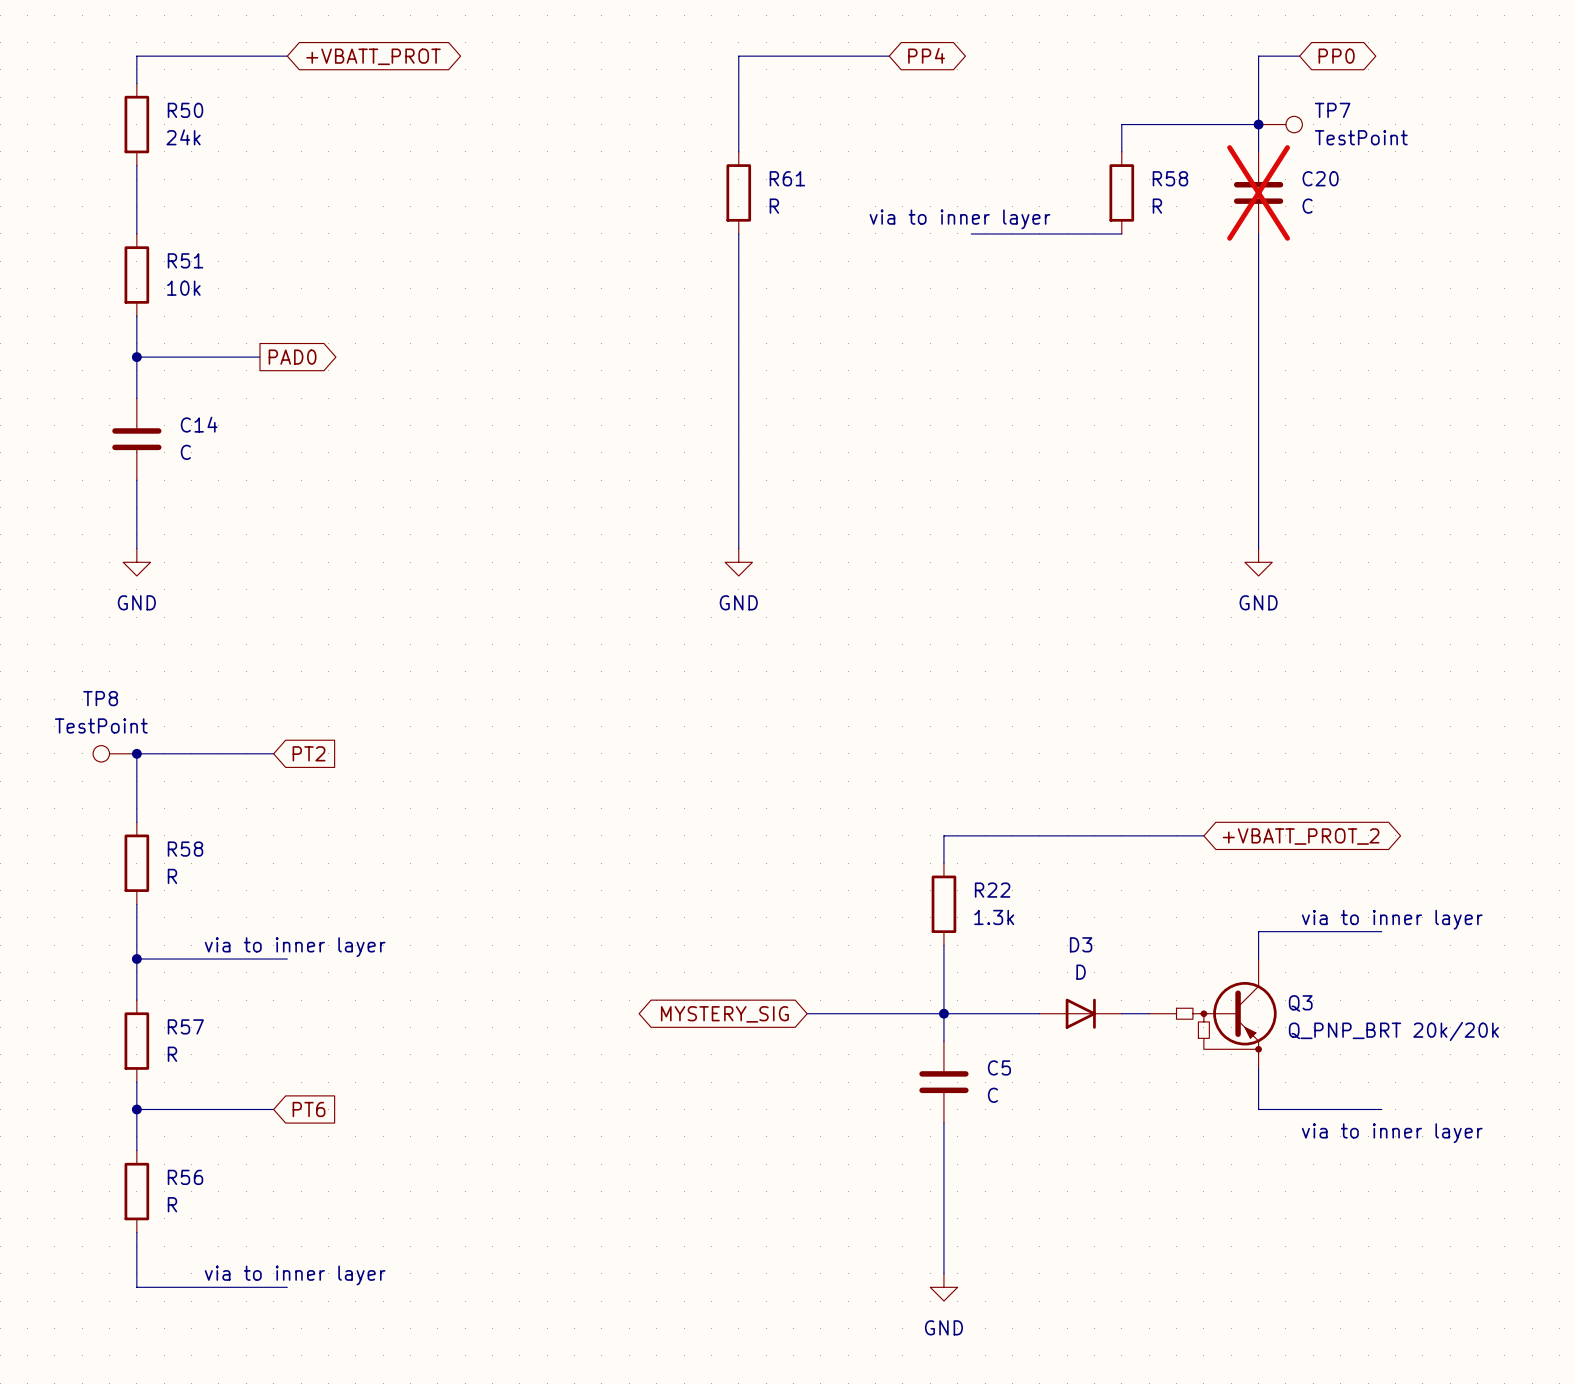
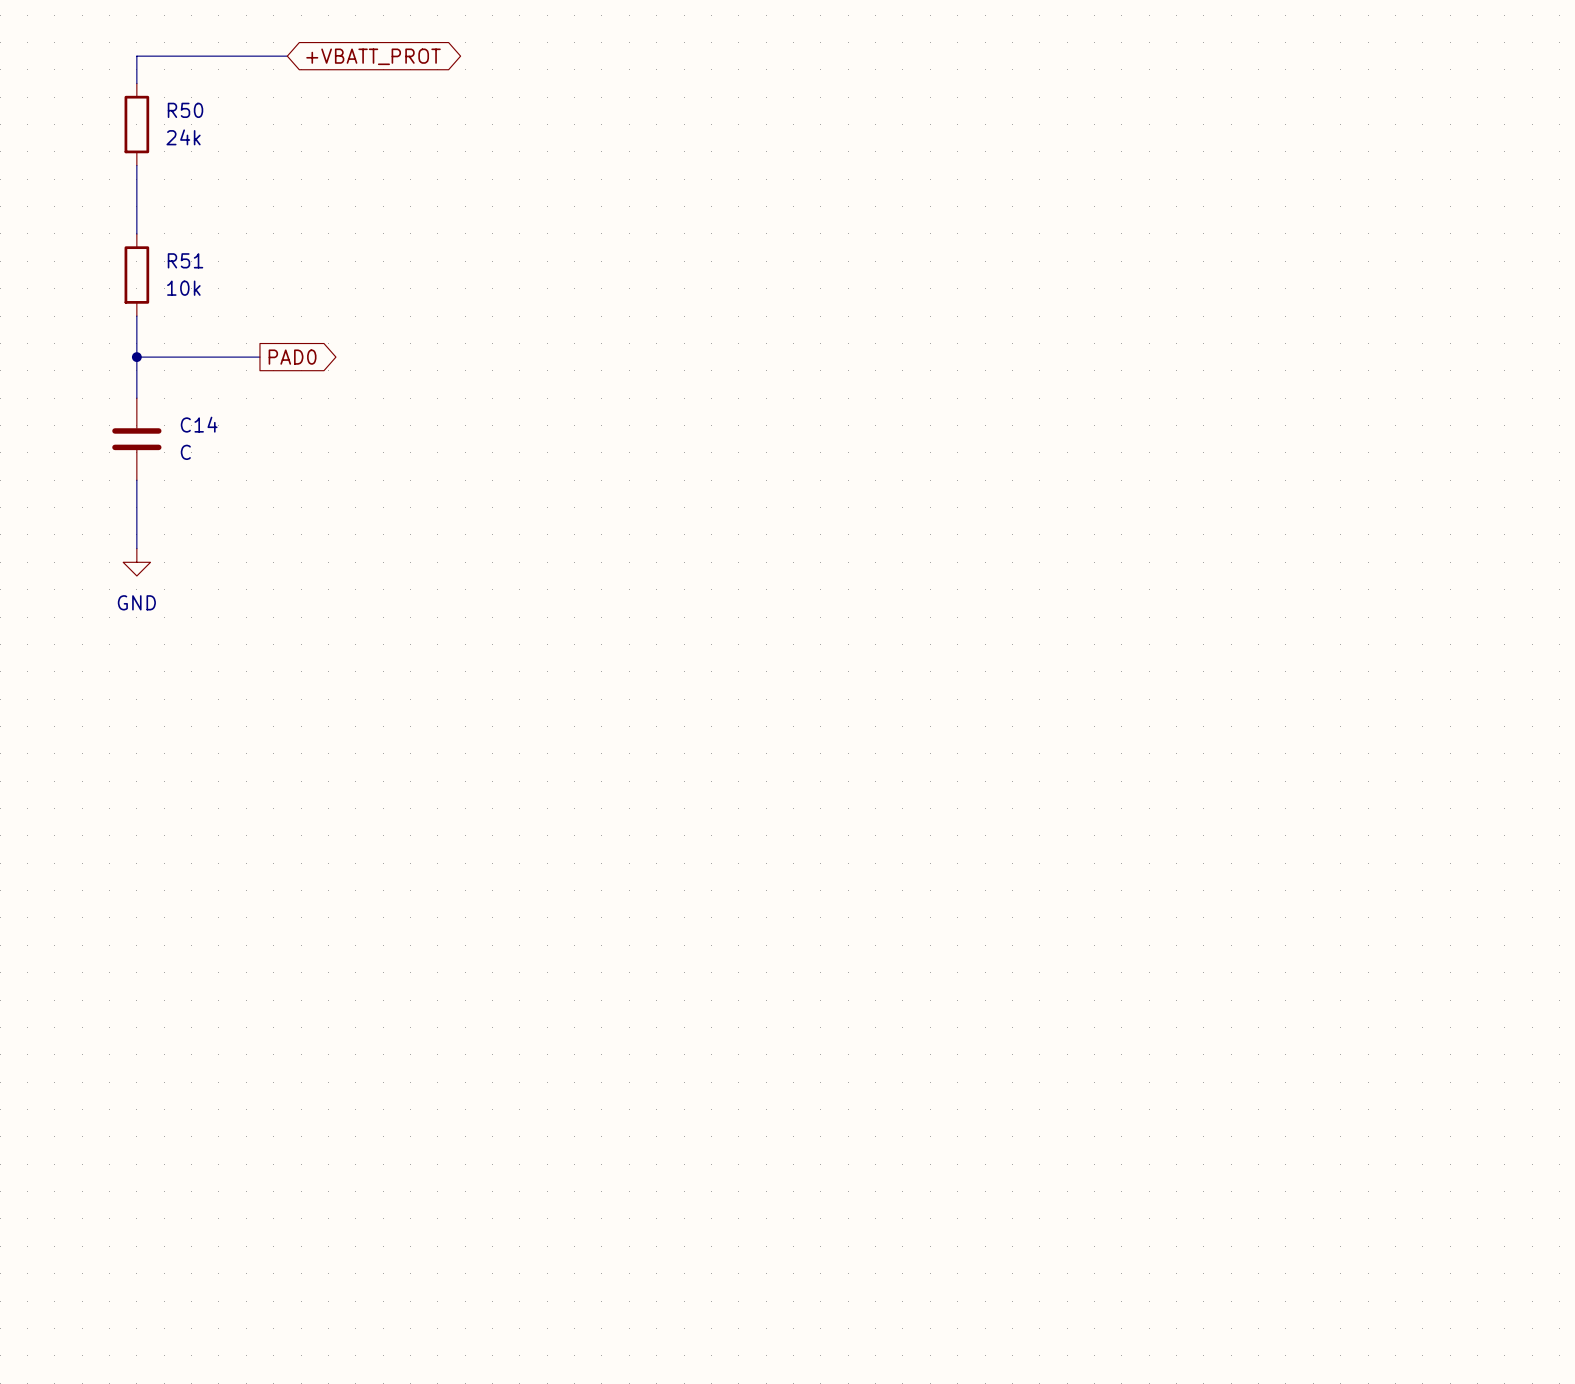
global label: PP4 (926, 55) -> none
wire: (889, 56) (738, 56) (738, 151) -> none
wire: (1299, 56) (1258, 56) (1258, 151) -> none
global label: PP0 (1336, 56) -> none
wire: (1258, 124) (1121, 124) (1121, 151) -> none
junction: (1258, 124) -> none
TP7: TestPoint (1280, 124) -> none
R61: R (738, 192) -> none
R58: R (1121, 192) -> none
C20: C (1258, 192) -> none
text: via to inner layer (959, 219) -> none
wire: (738, 233) (738, 548) -> none
wire: (971, 233) (1121, 233) -> none
wire: (1258, 233) (1258, 548) -> none
power symbol: GND (738, 562) -> none
power symbol: GND (1258, 562) -> none
TP8: TestPoint (114, 753) -> none
junction: (136, 753) -> none
wire: (273, 753) (136, 753) (136, 822) -> none
global label: PT2 (309, 753) -> none
wire: (1203, 835) (943, 835) (943, 863) -> none
global label: +VBATT_PROT_2 (1301, 836) -> none
R58: R (136, 863) -> none
wire: (136, 904) (136, 1000) -> none
R22: 1.3k (943, 904) -> none
text: via to inner layer (1392, 919) -> none
wire: (1381, 931) (1258, 931) (1258, 959) -> none
wire: (943, 945) (943, 1041) -> none
text: via to inner layer (295, 947) -> none
wire: (136, 959) (287, 959) -> none
junction: (136, 959) -> none
wire: (807, 1013) (1039, 1013) -> none
junction: (943, 1013) -> none
D3: D (1080, 1013) -> none
wire: (1121, 1013) (1149, 1013) -> none
Q3: Q_PNP_BRT 20k/20k (1212, 1013) -> none
global label: MYSTERY_SIG (724, 1014) -> none
R57: R (136, 1041) -> none
wire: (1258, 1068) (1258, 1109) (1381, 1109) -> none
wire: (136, 1082) (136, 1150) -> none
C5: C (943, 1082) -> none
wire: (136, 1109) (273, 1109) -> none
junction: (136, 1109) -> none
global label: PT6 (309, 1109) -> none
wire: (943, 1123) (943, 1273) -> none
text: via to inner layer (1392, 1133) -> none
R56: R (136, 1191) -> none
wire: (136, 1232) (136, 1287) (287, 1287) -> none
text: via to inner layer (295, 1275) -> none
power symbol: GND (943, 1287) -> none

